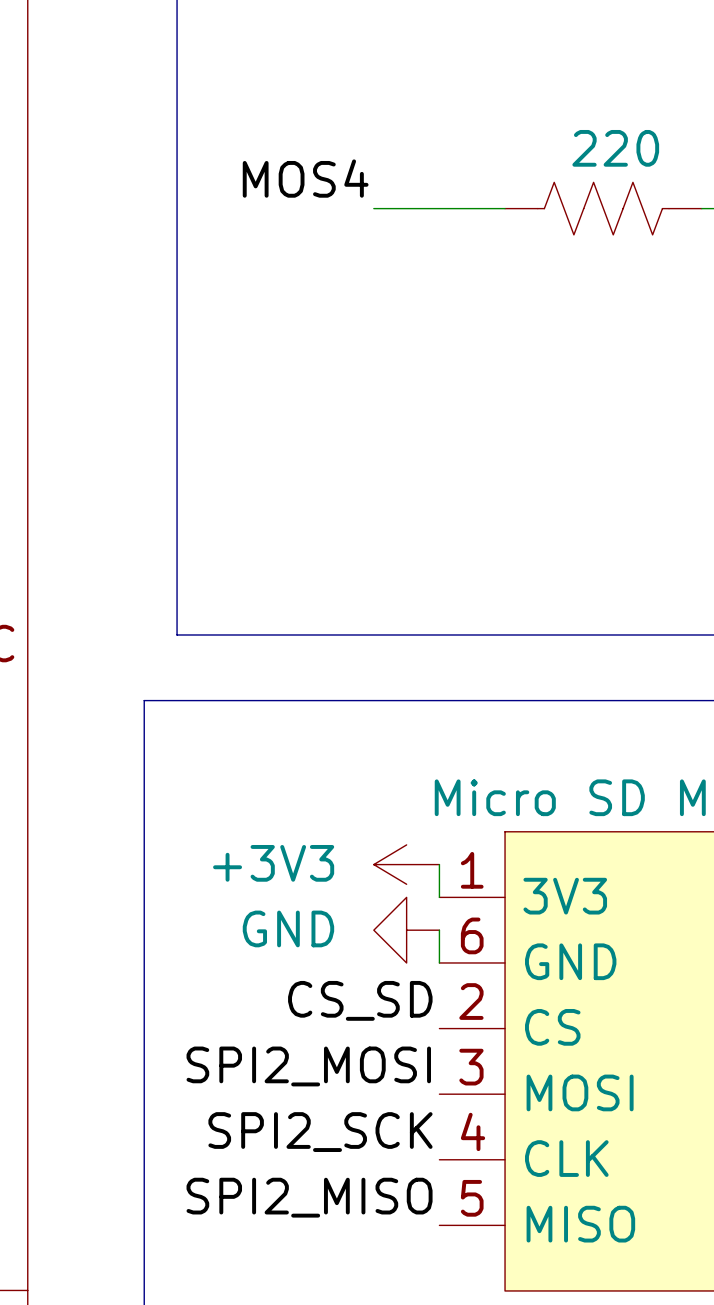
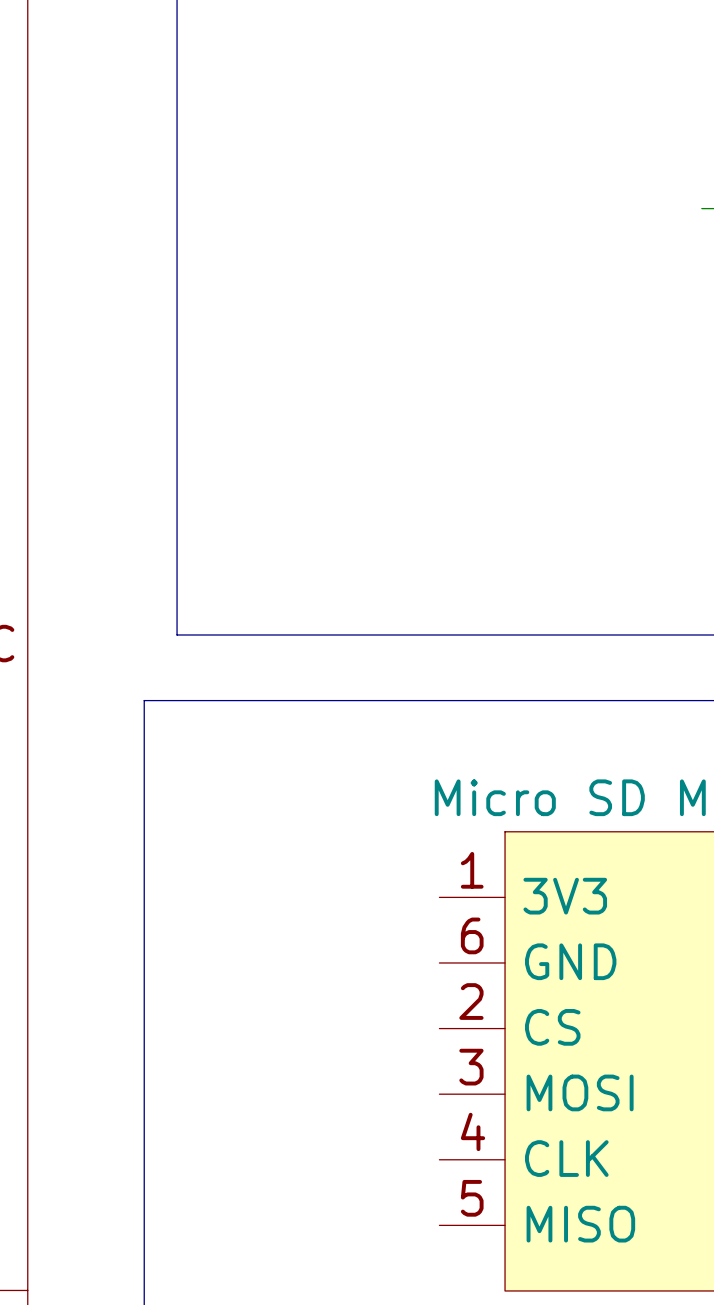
label: MOS4 (305, 178) -> none
wire: (373, 208) (505, 208) -> none
part: 220 (603, 208) -> none
power symbol: +3V3 (406, 864) -> none
wire: (439, 864) (439, 897) -> none
power symbol: GND (406, 930) -> none
wire: (439, 930) (439, 962) -> none
label: CS_SD (360, 1000) -> none
label: SPI2_MOSI (308, 1066) -> none
label: SPI2_SCK (320, 1132) -> none
label: SPI2_MISO (309, 1197) -> none

